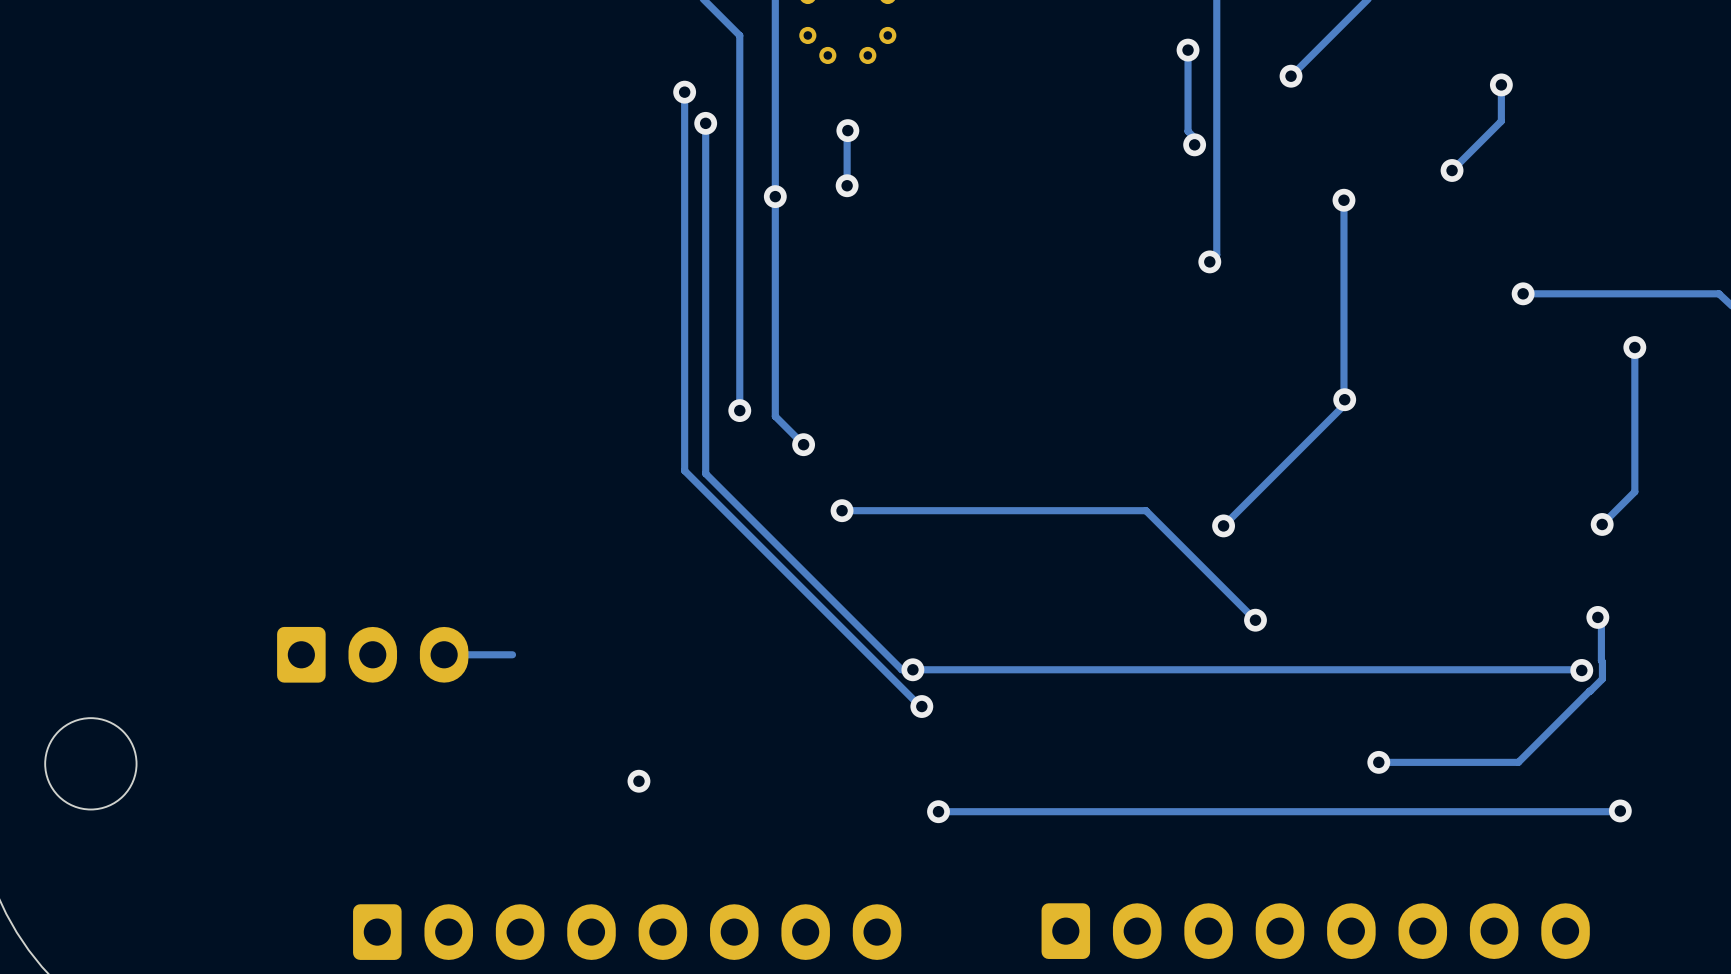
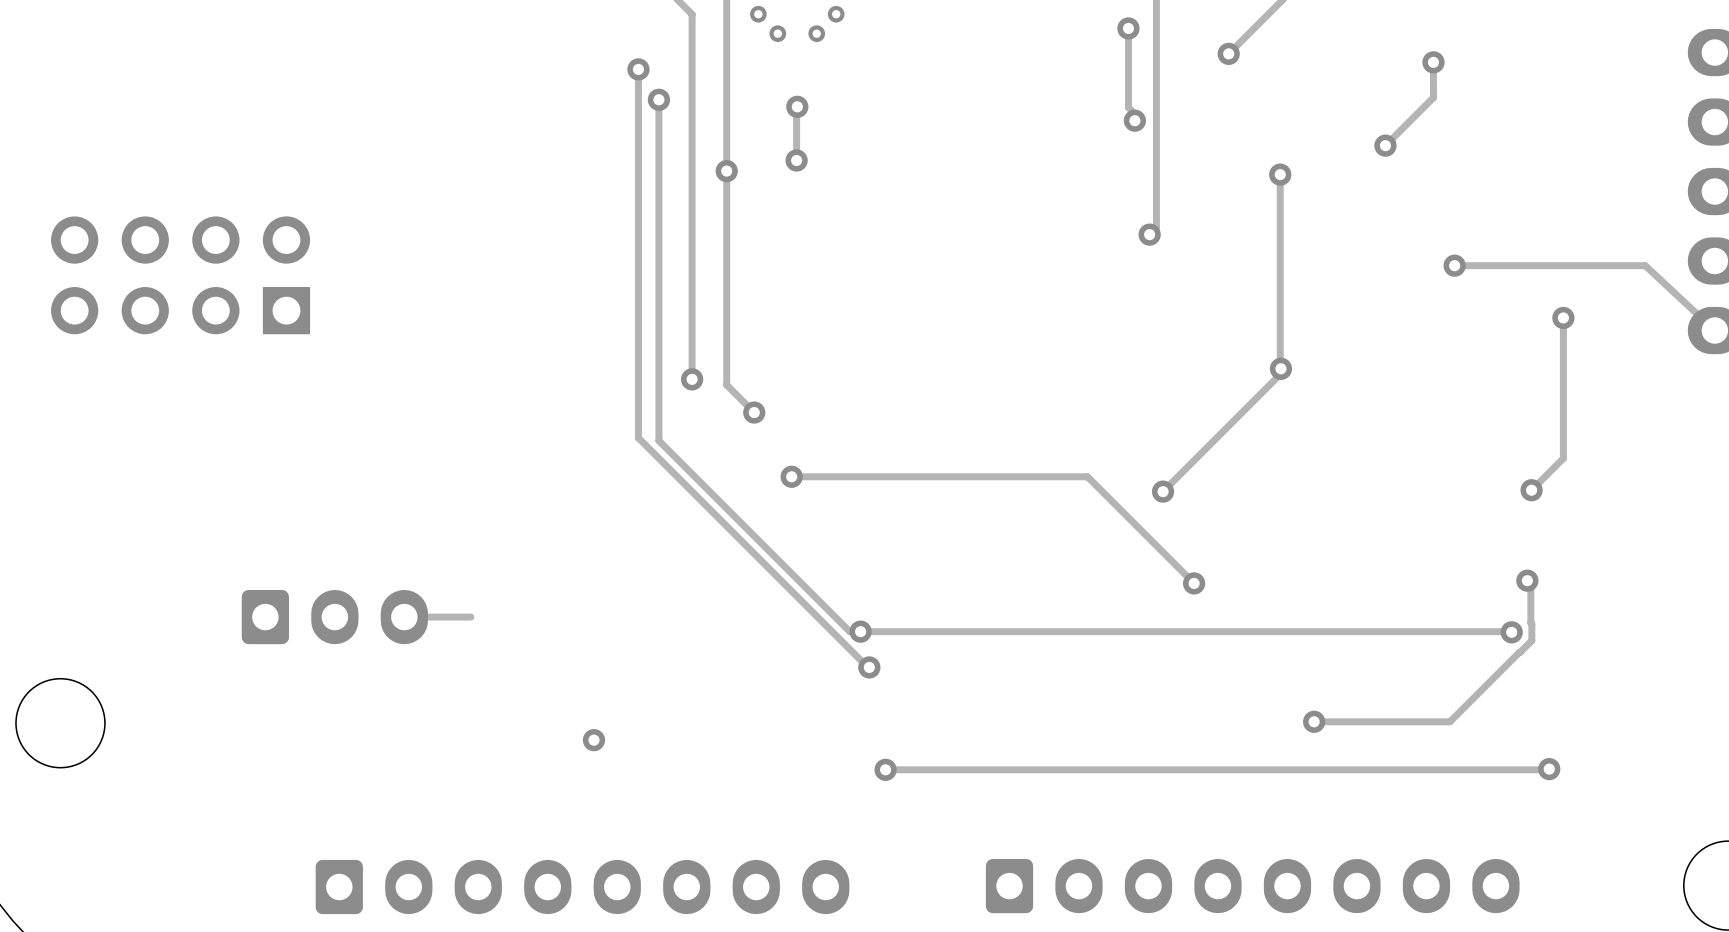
part: none -> (180, 275)

